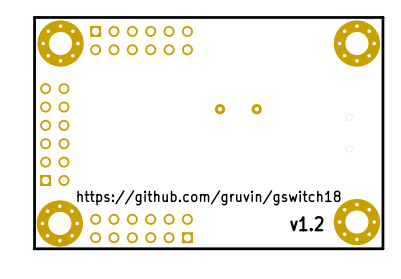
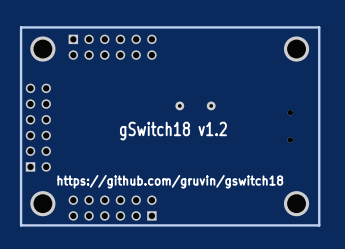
part footprint: [37, 20, 84, 67] -> [30, 36, 56, 62]
part footprint: [333, 20, 381, 67] -> [283, 36, 310, 62]
text: none -> gSwitch18 v1.2 (173, 131)
part footprint: [333, 198, 381, 246] -> [283, 191, 310, 217]
part footprint: [36, 200, 83, 247] -> [30, 191, 56, 217]
text: v1.2 (306, 223) -> none

